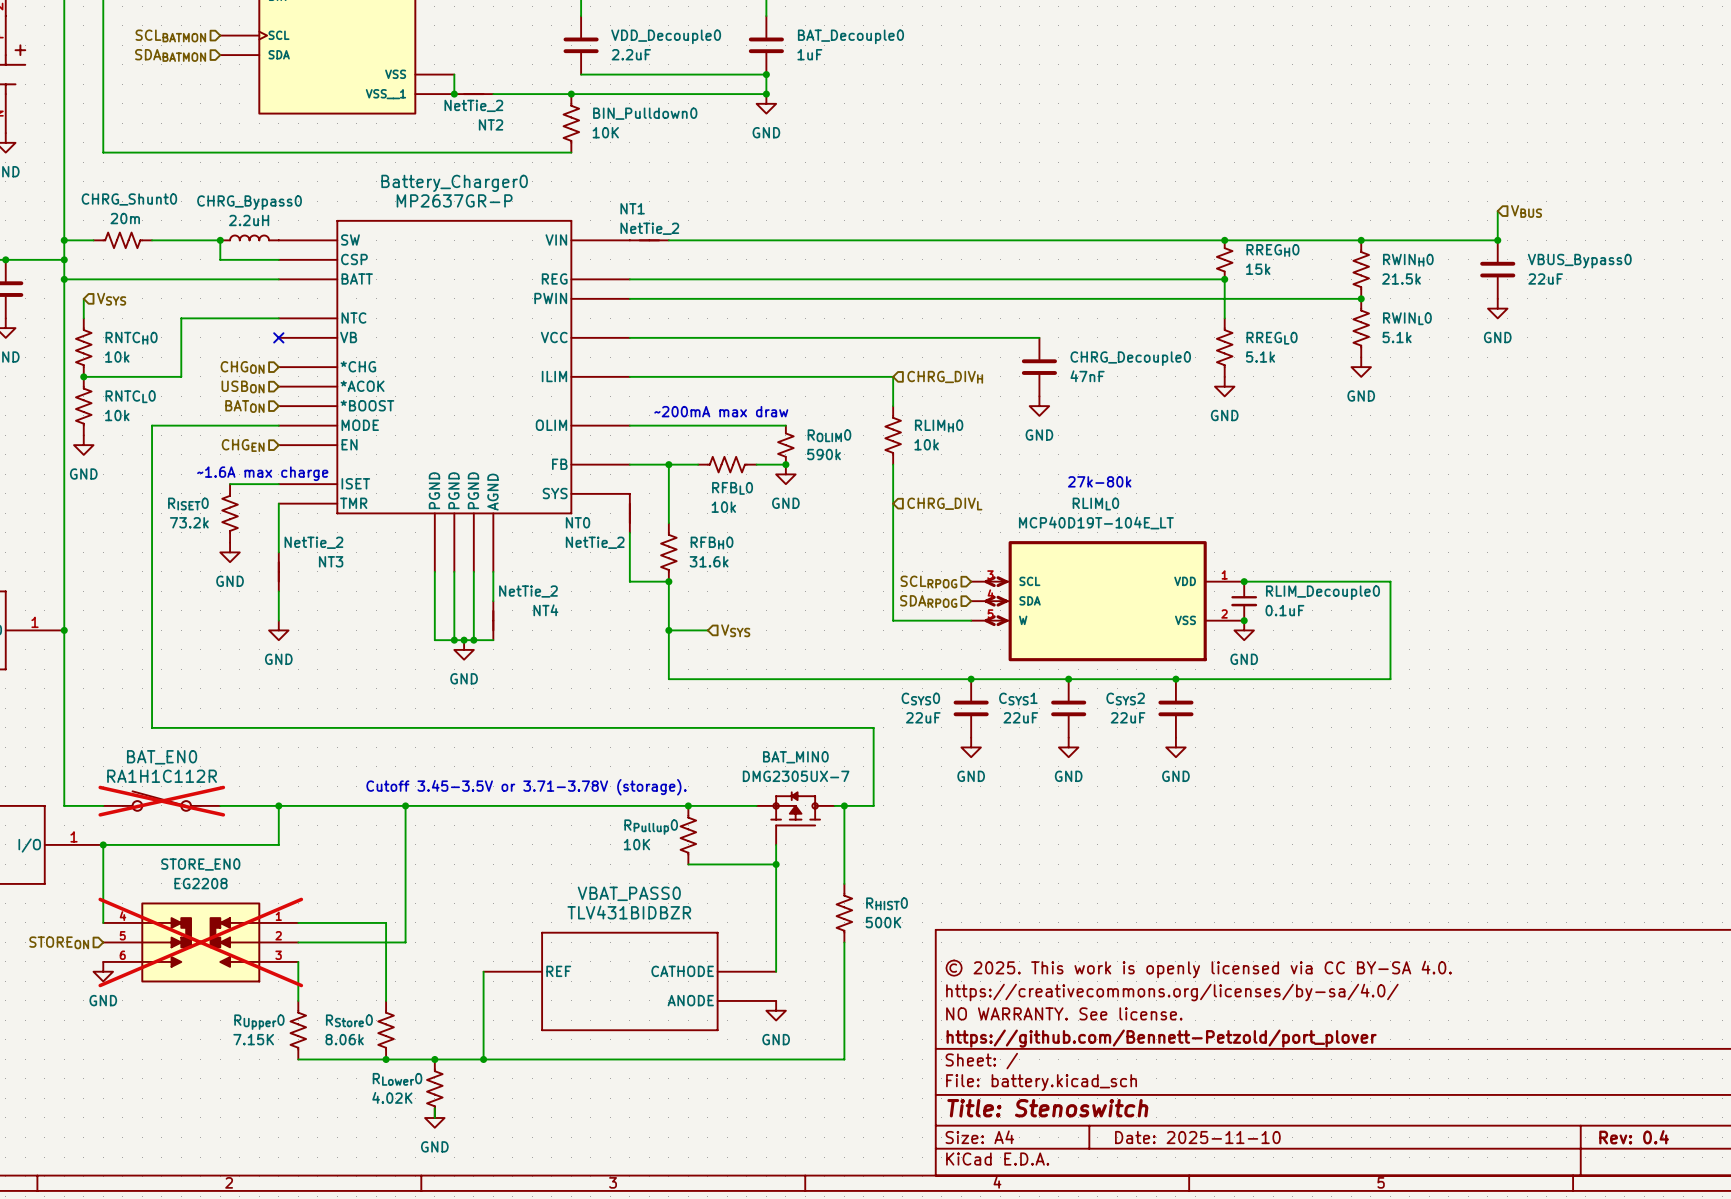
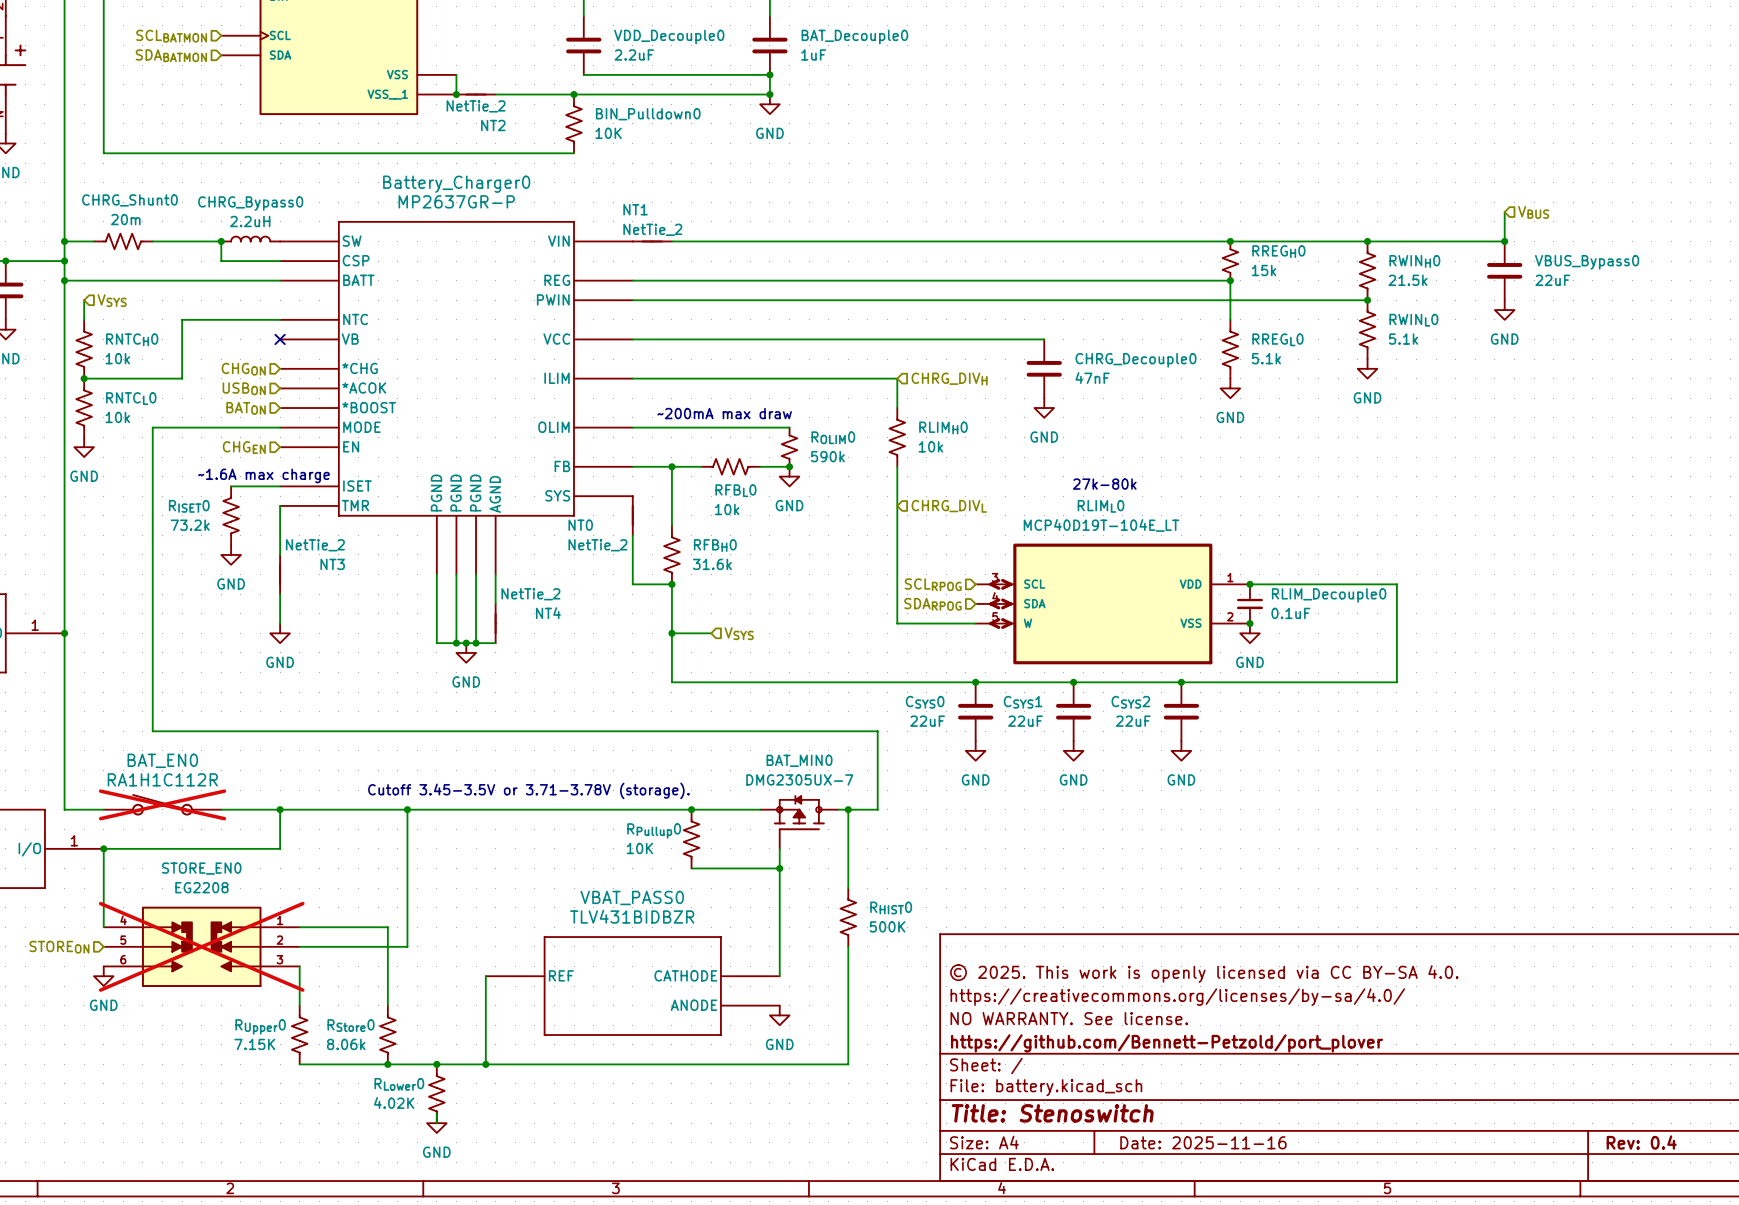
title block: Date: 2025-11-10 (1197, 1137) -> Date: 2025-11-16 (1203, 1142)

